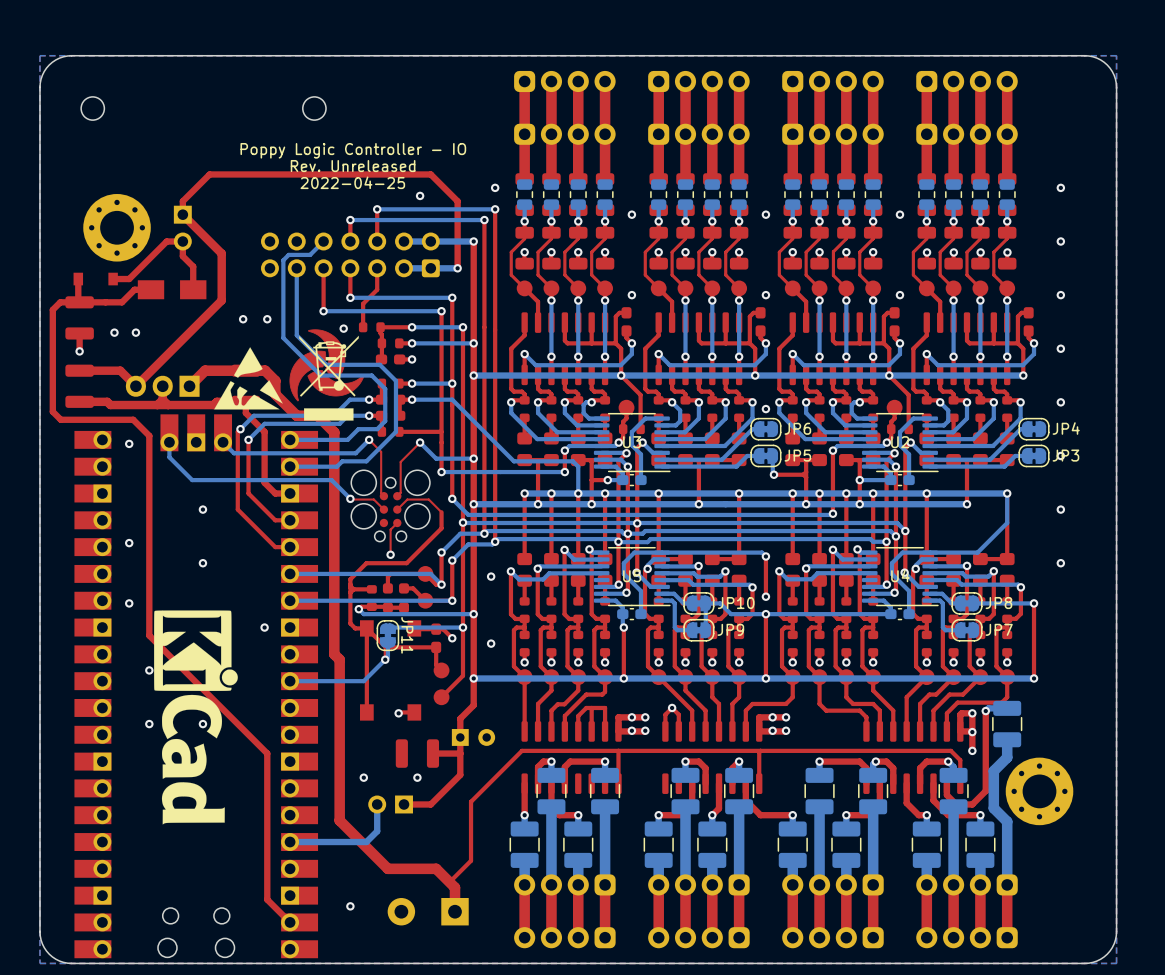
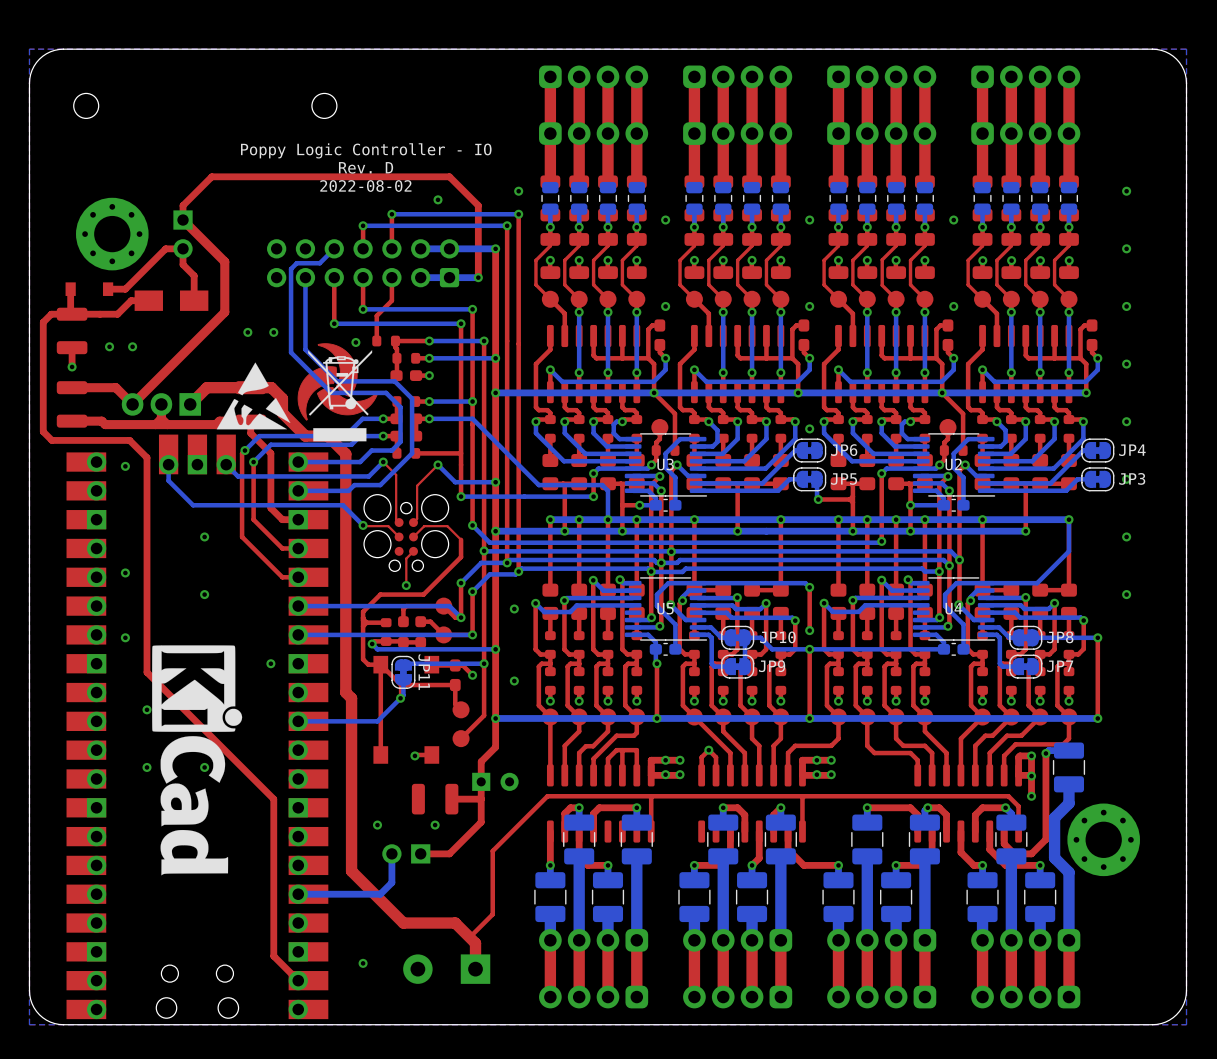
text: Rev. Unreleased (353, 166) -> Rev. D (366, 167)
text: 2022-04-25 (352, 182) -> 2022-08-02 (365, 186)

